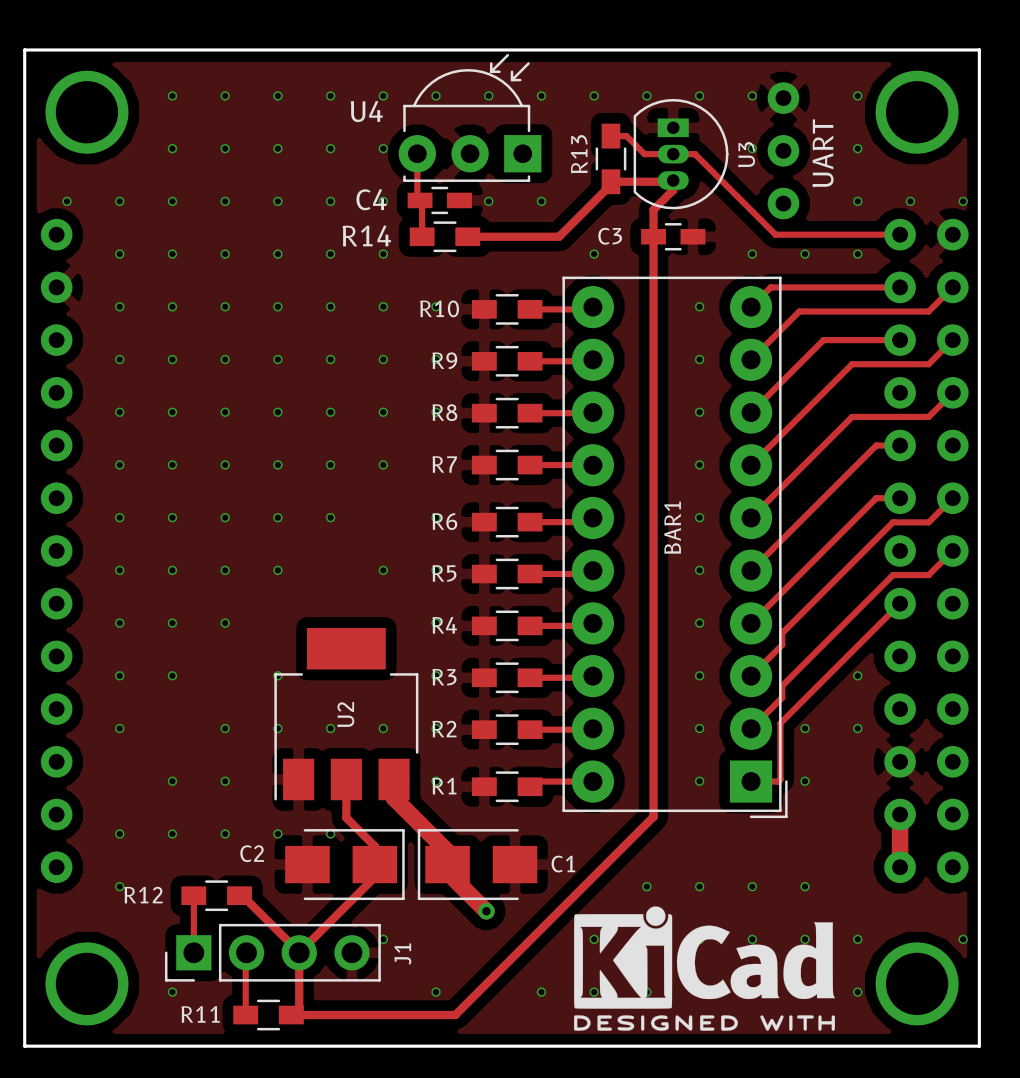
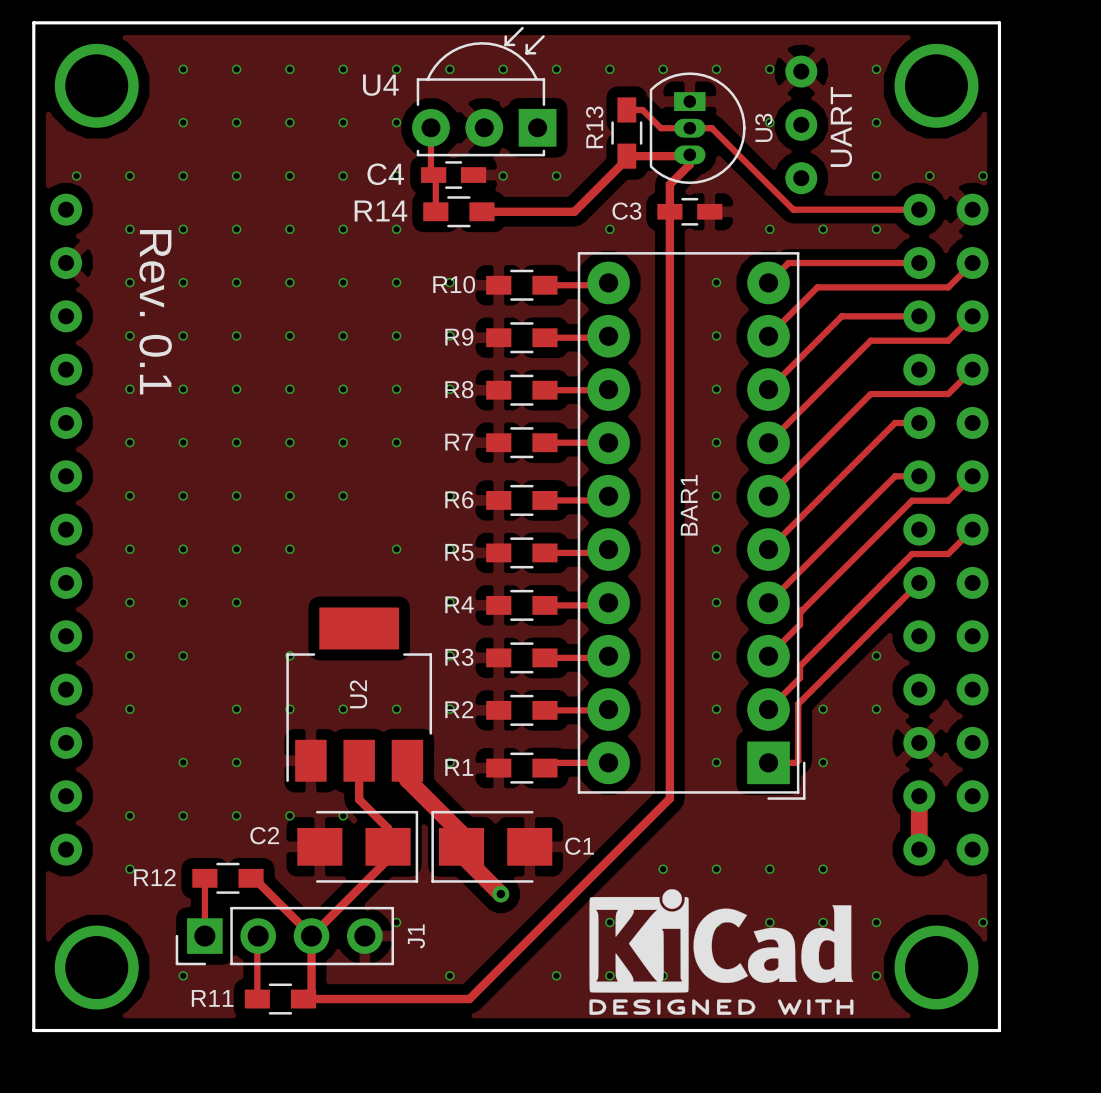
text: none -> Rev. 0.1 (155, 312)

